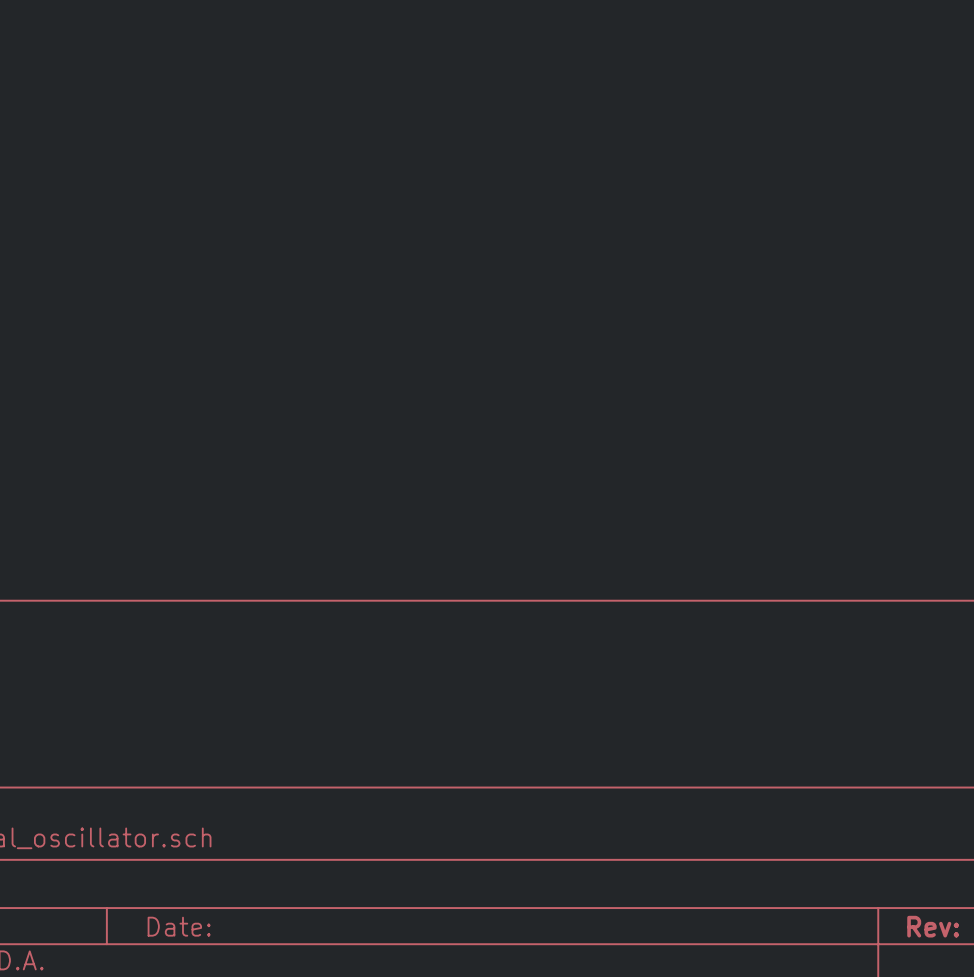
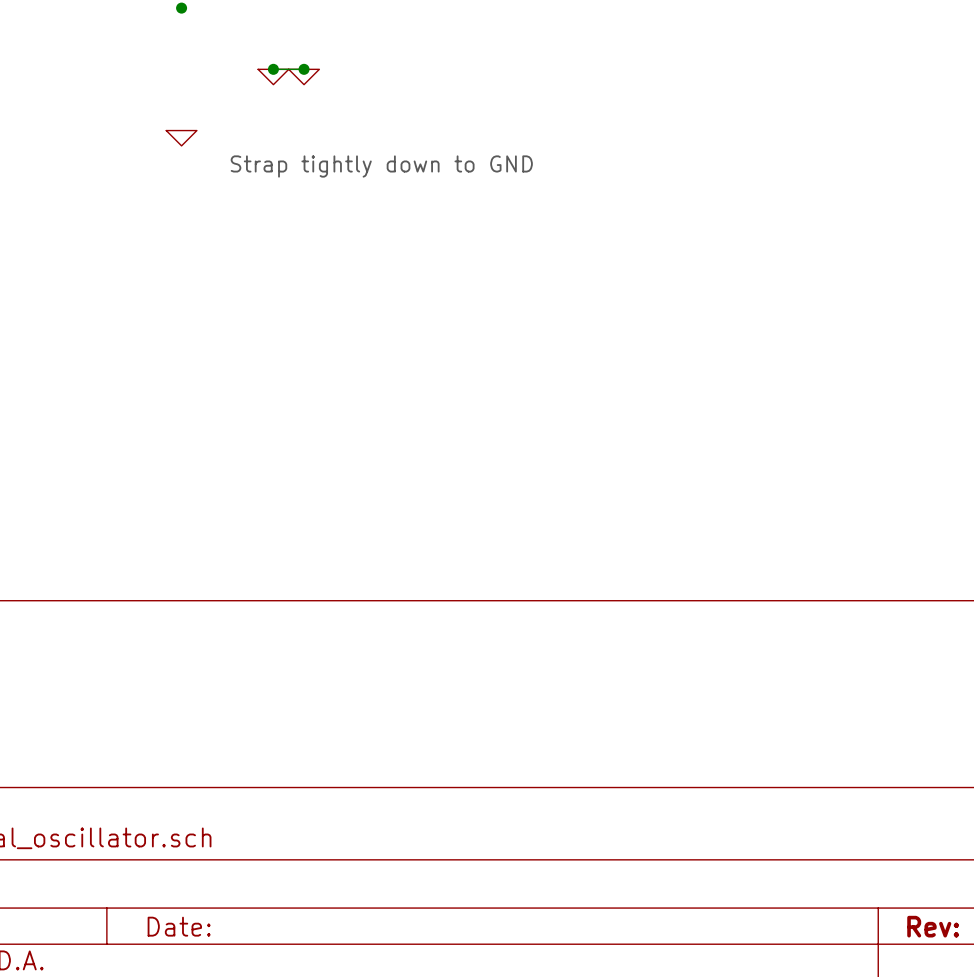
junction: none -> (181, 8)
wire: none -> (273, 69) (304, 69)
junction: none -> (273, 69)
junction: none -> (304, 69)
power symbol: none -> (273, 76)
power symbol: none -> (304, 76)
power symbol: none -> (181, 138)
text: none -> Strap tightly down to GND (381, 166)

